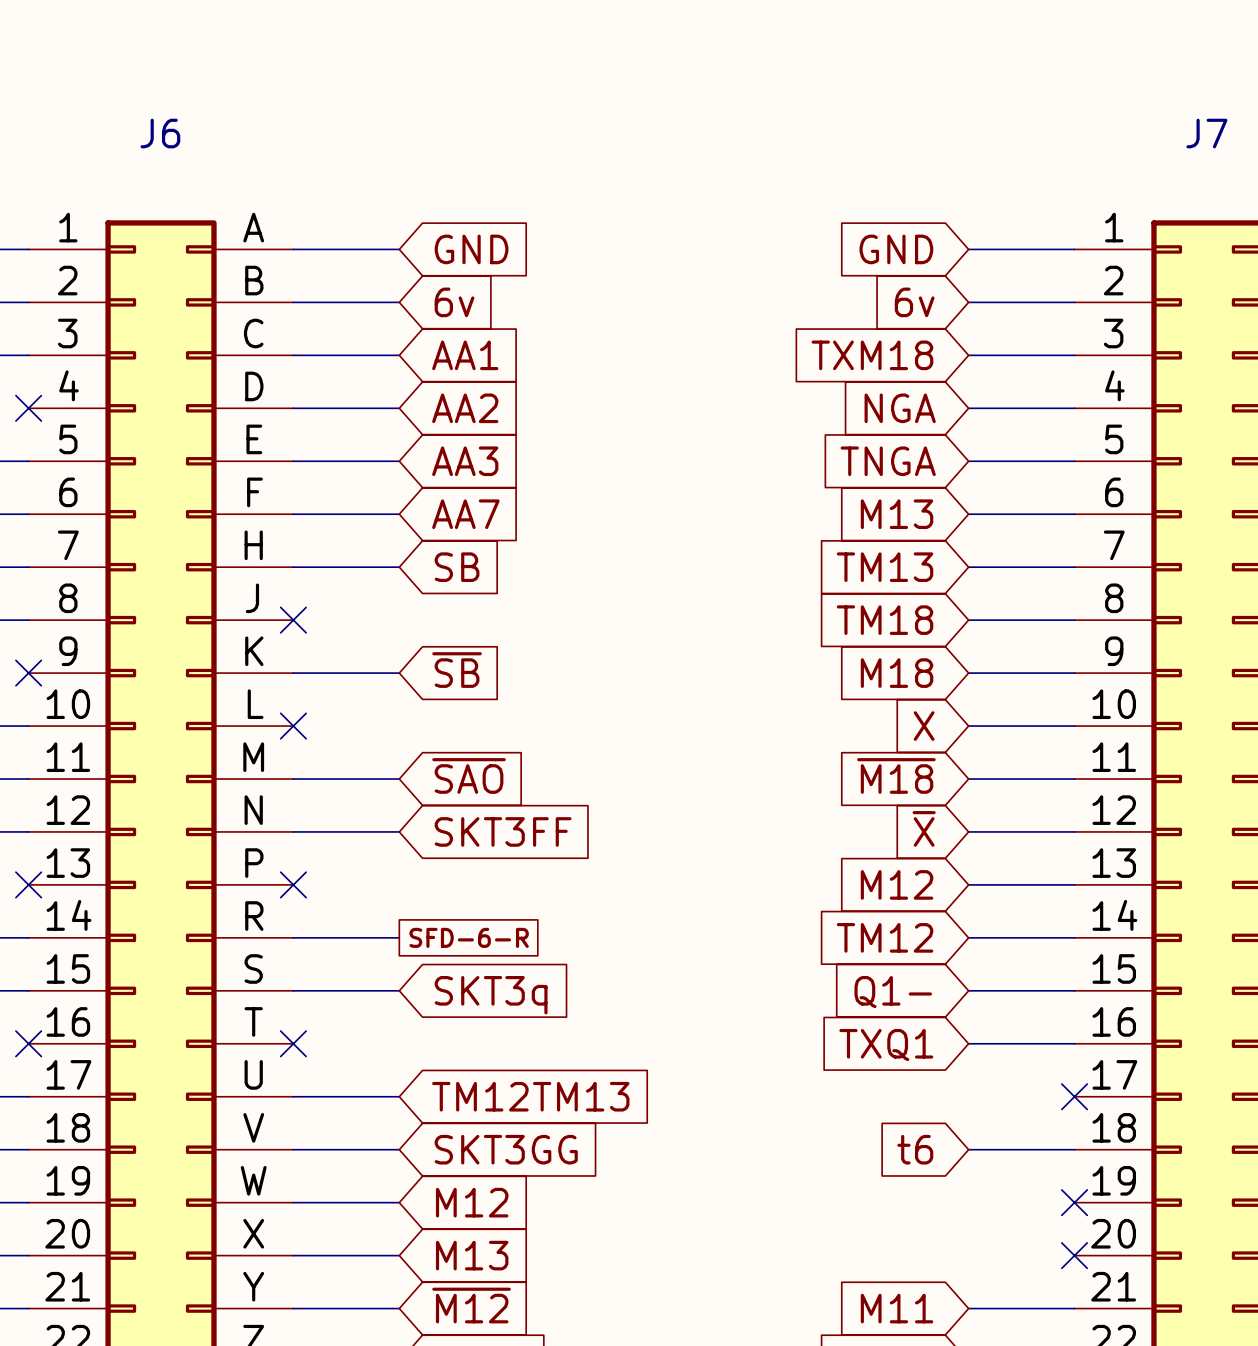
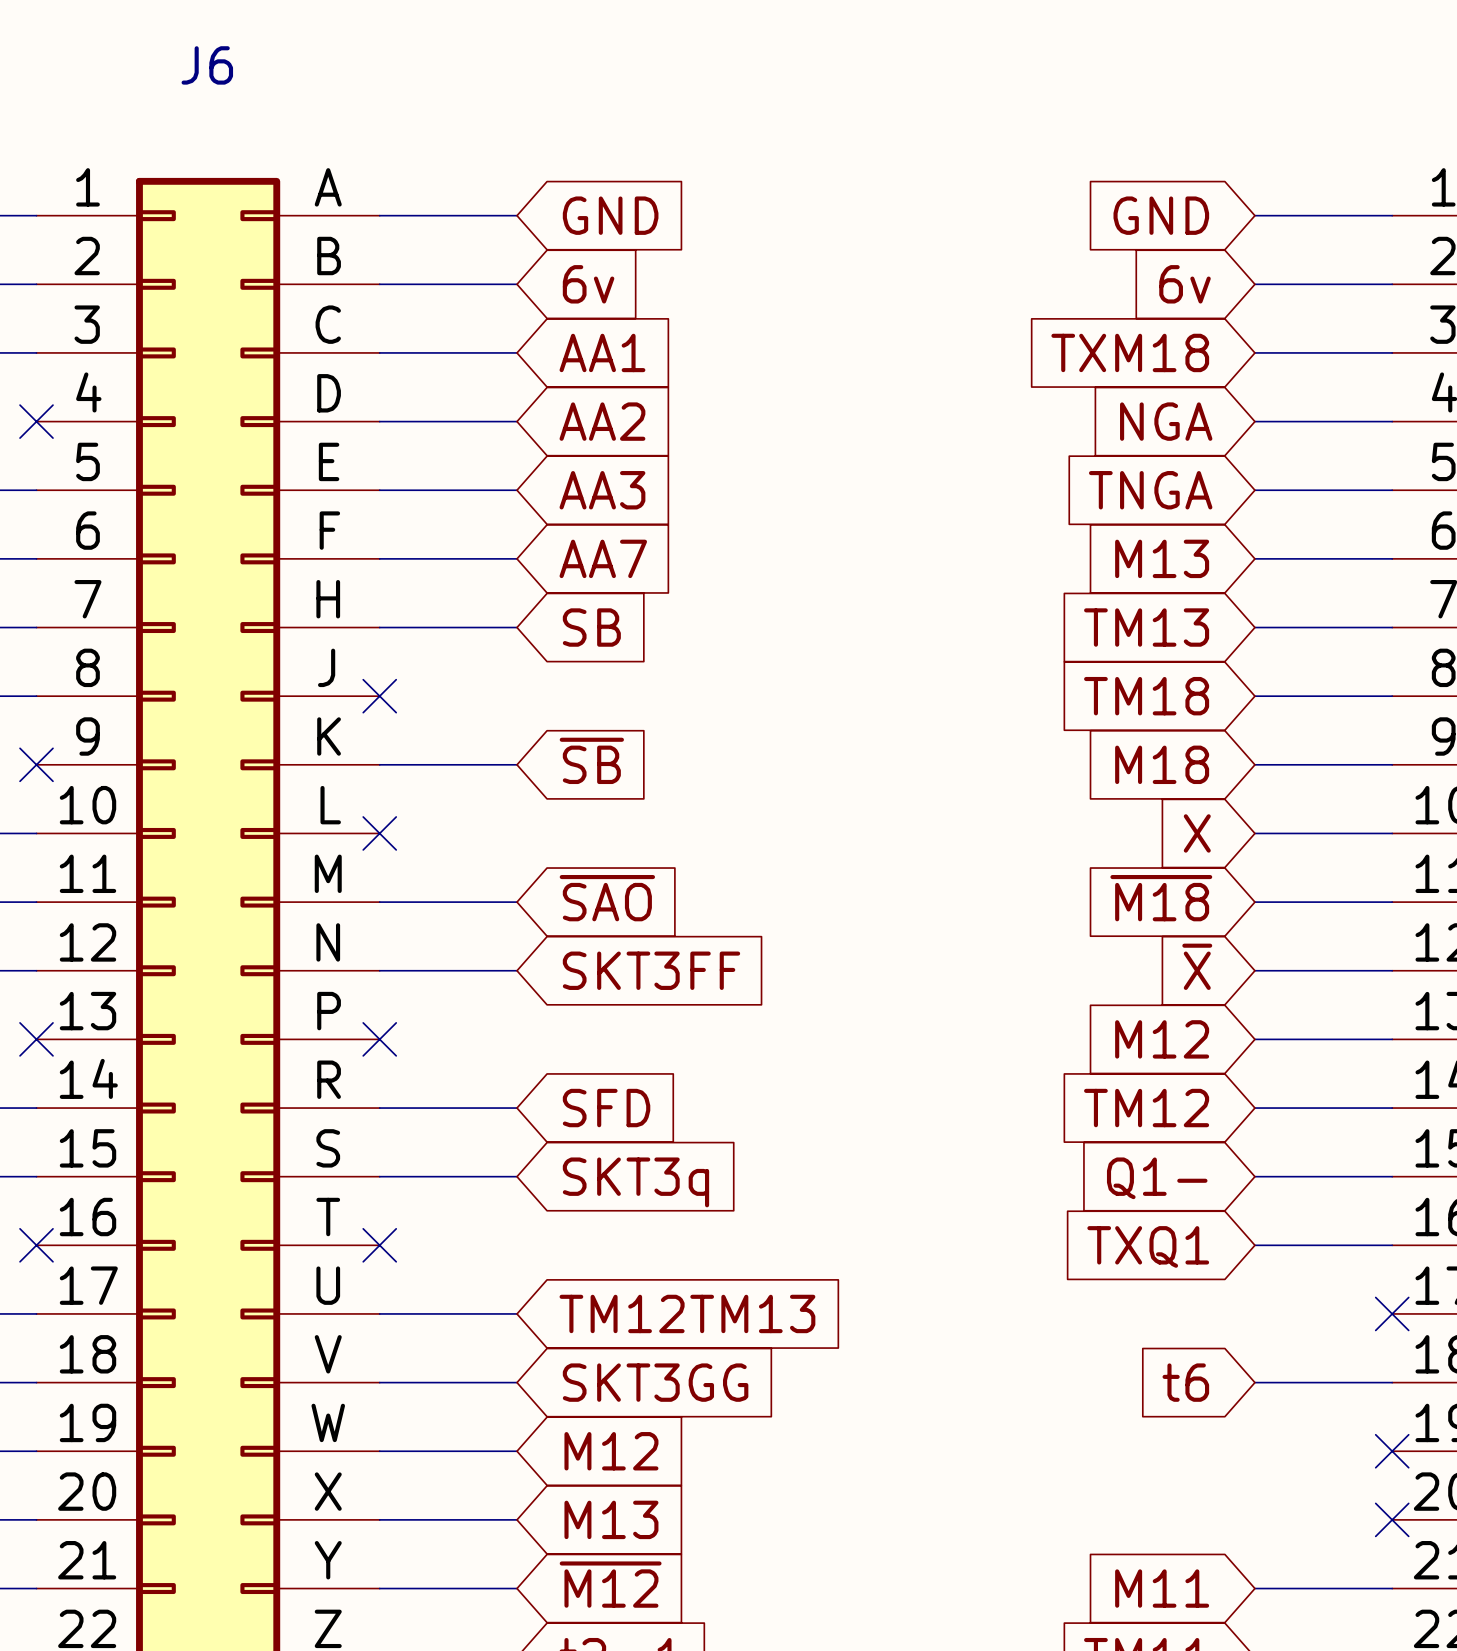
global label shape: passive (469, 937) -> input (606, 1108)
global label: SFD-6-R (469, 937) -> SFD (606, 1108)

